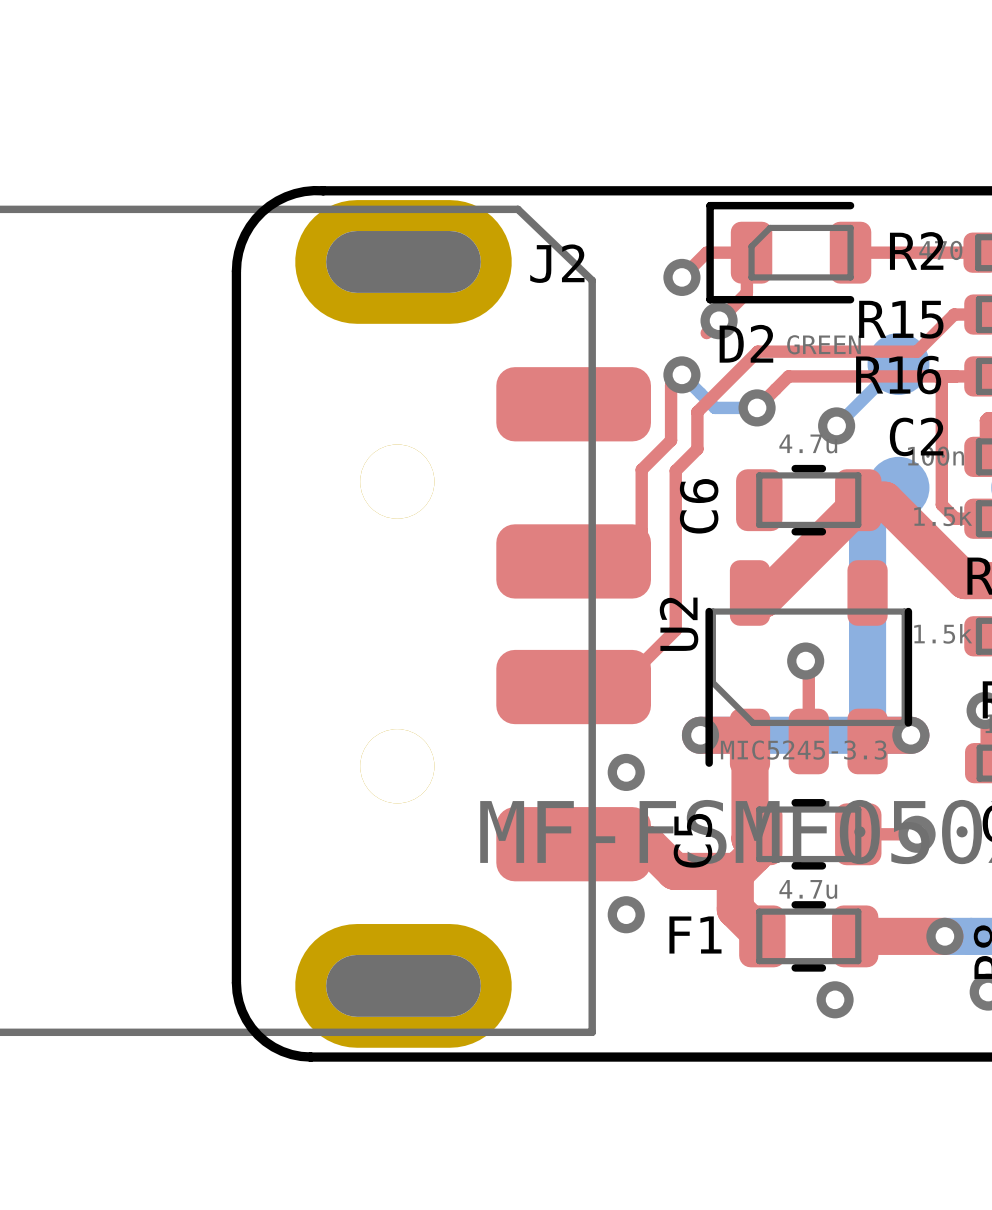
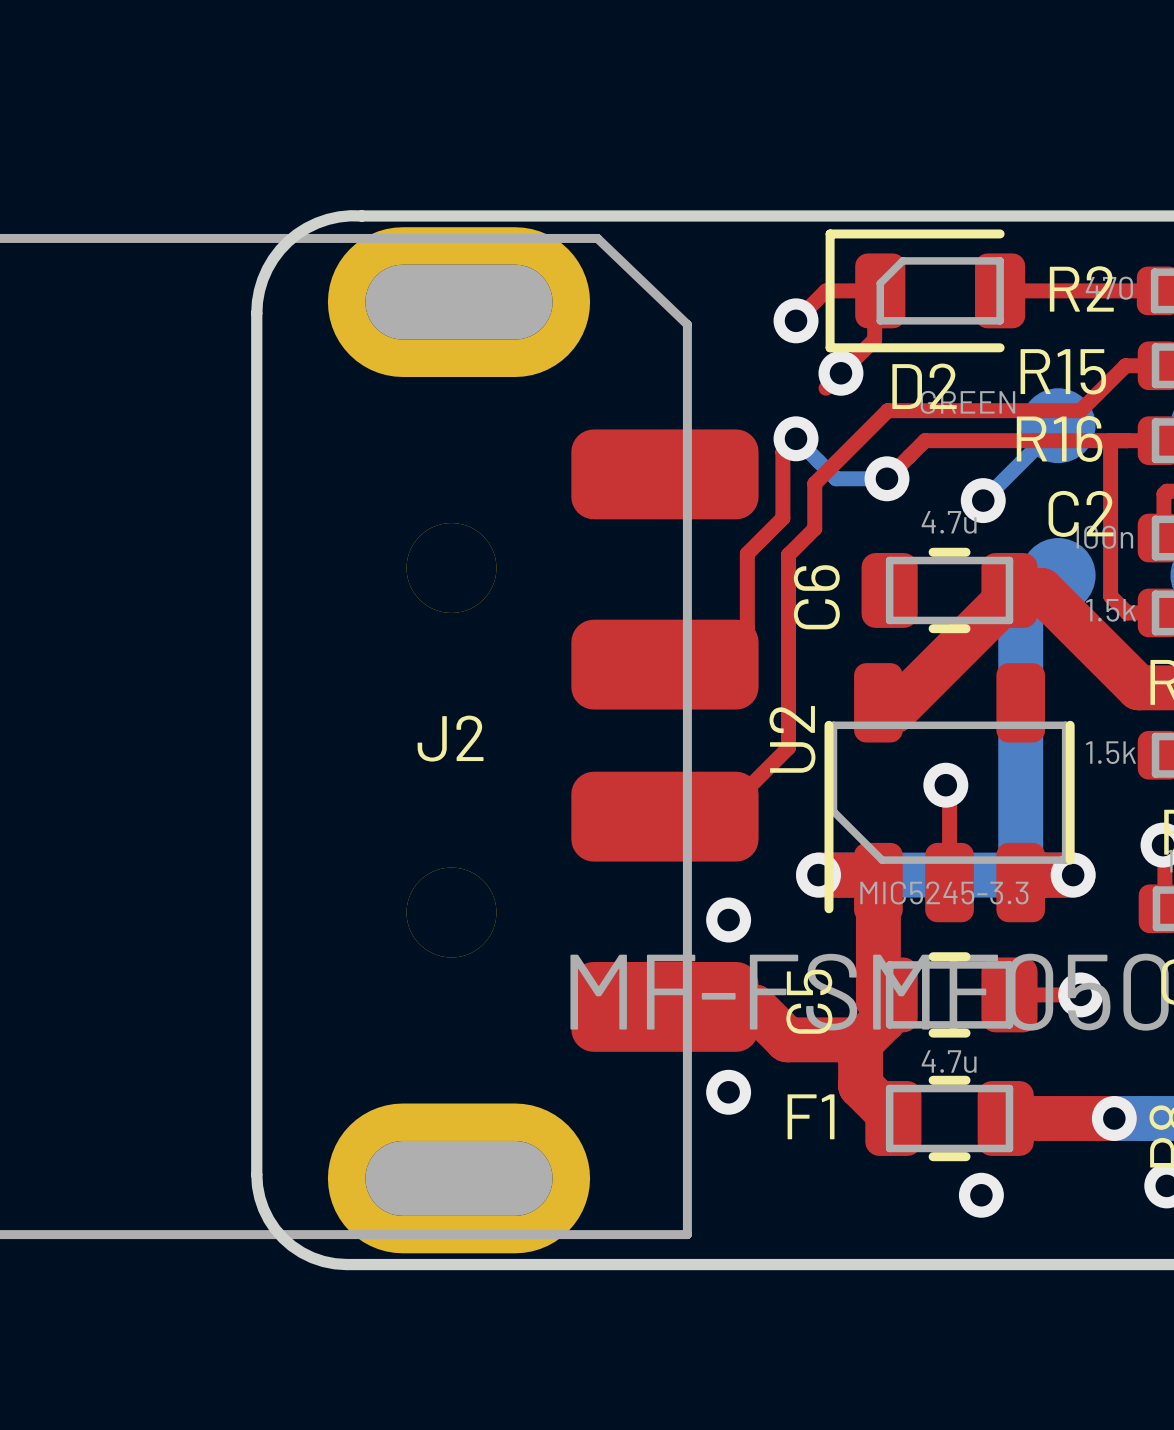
J2 name position: J2 (557, 263) -> J2 (450, 738)
D2 name position: D2 (746, 343) -> D2 (924, 386)

